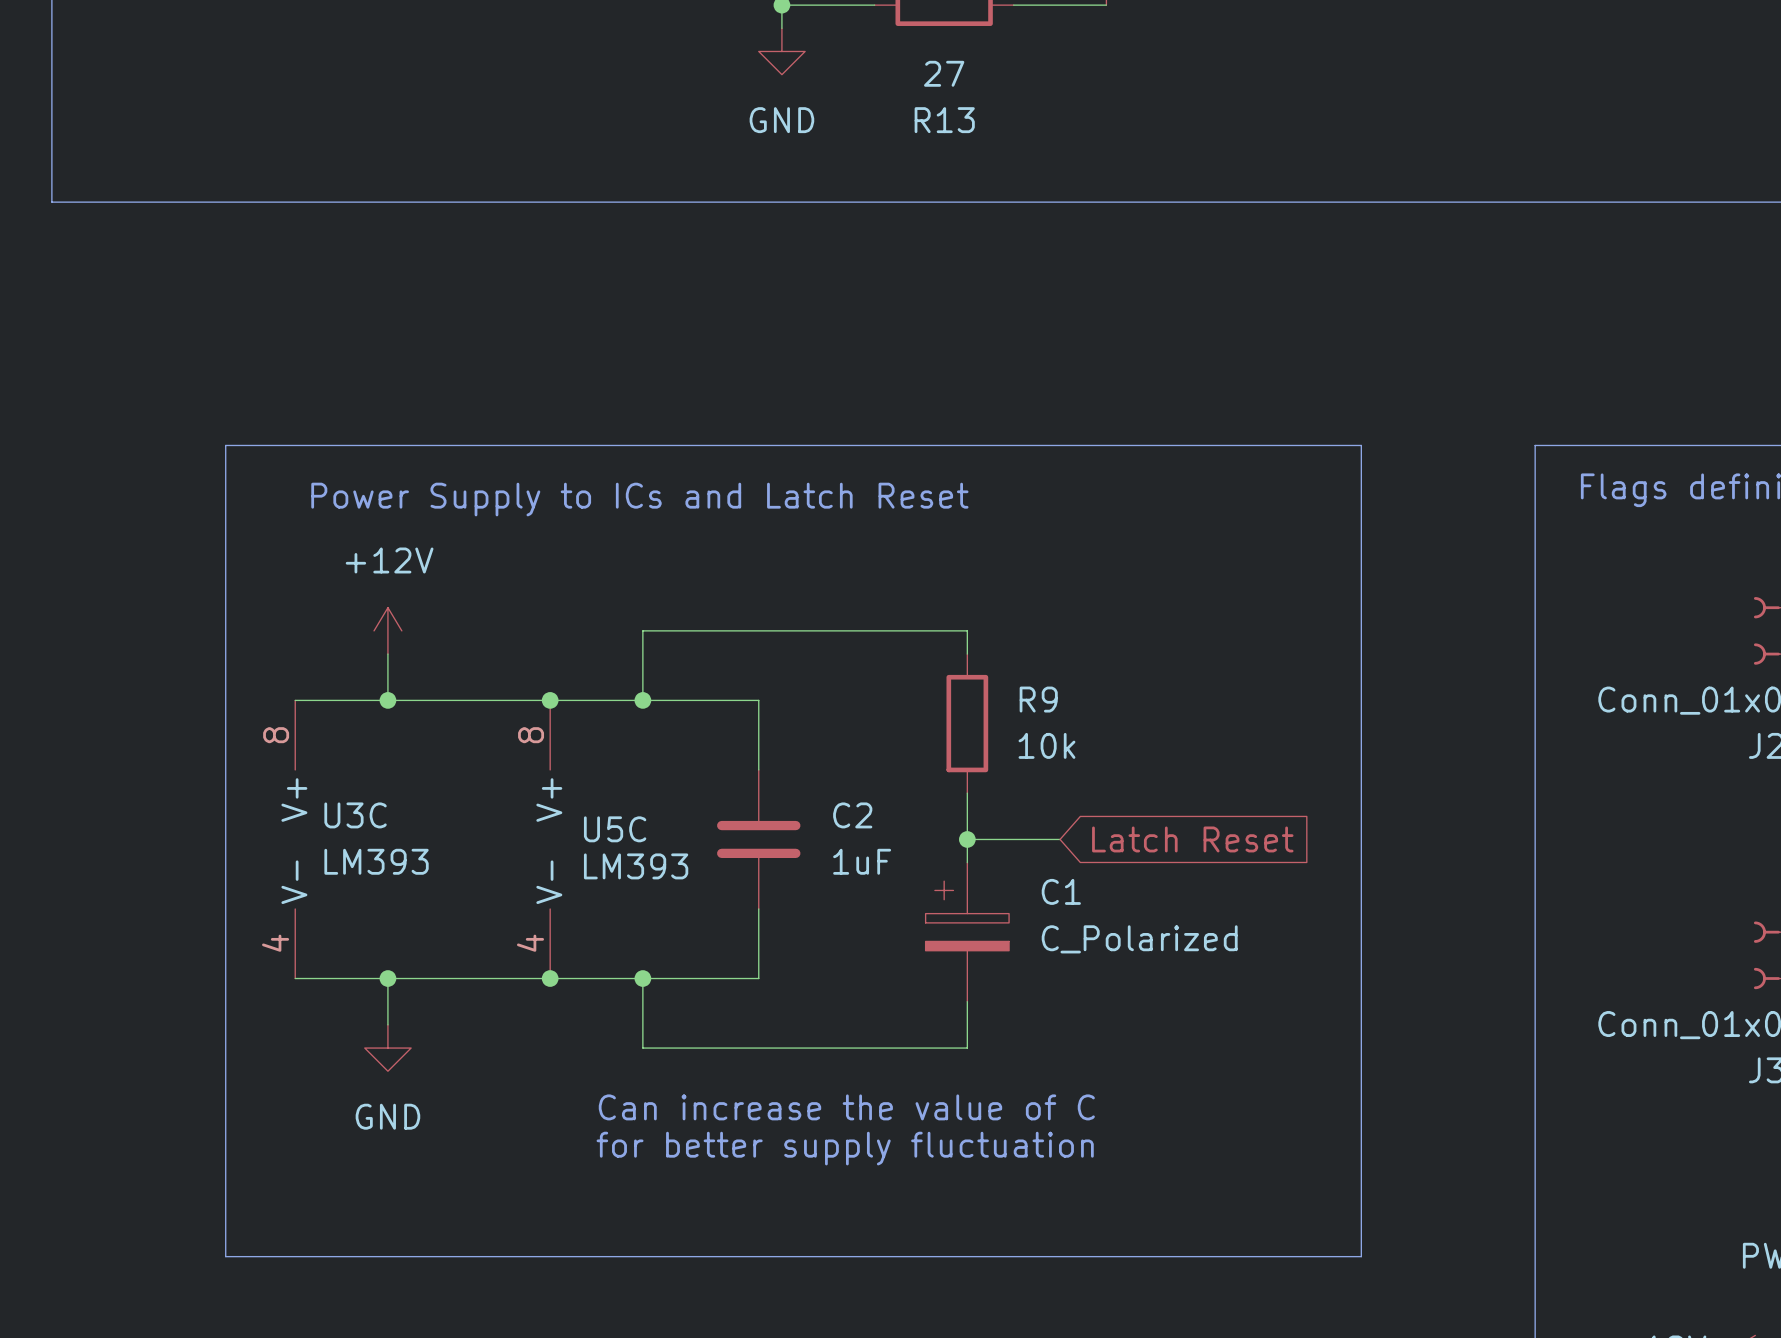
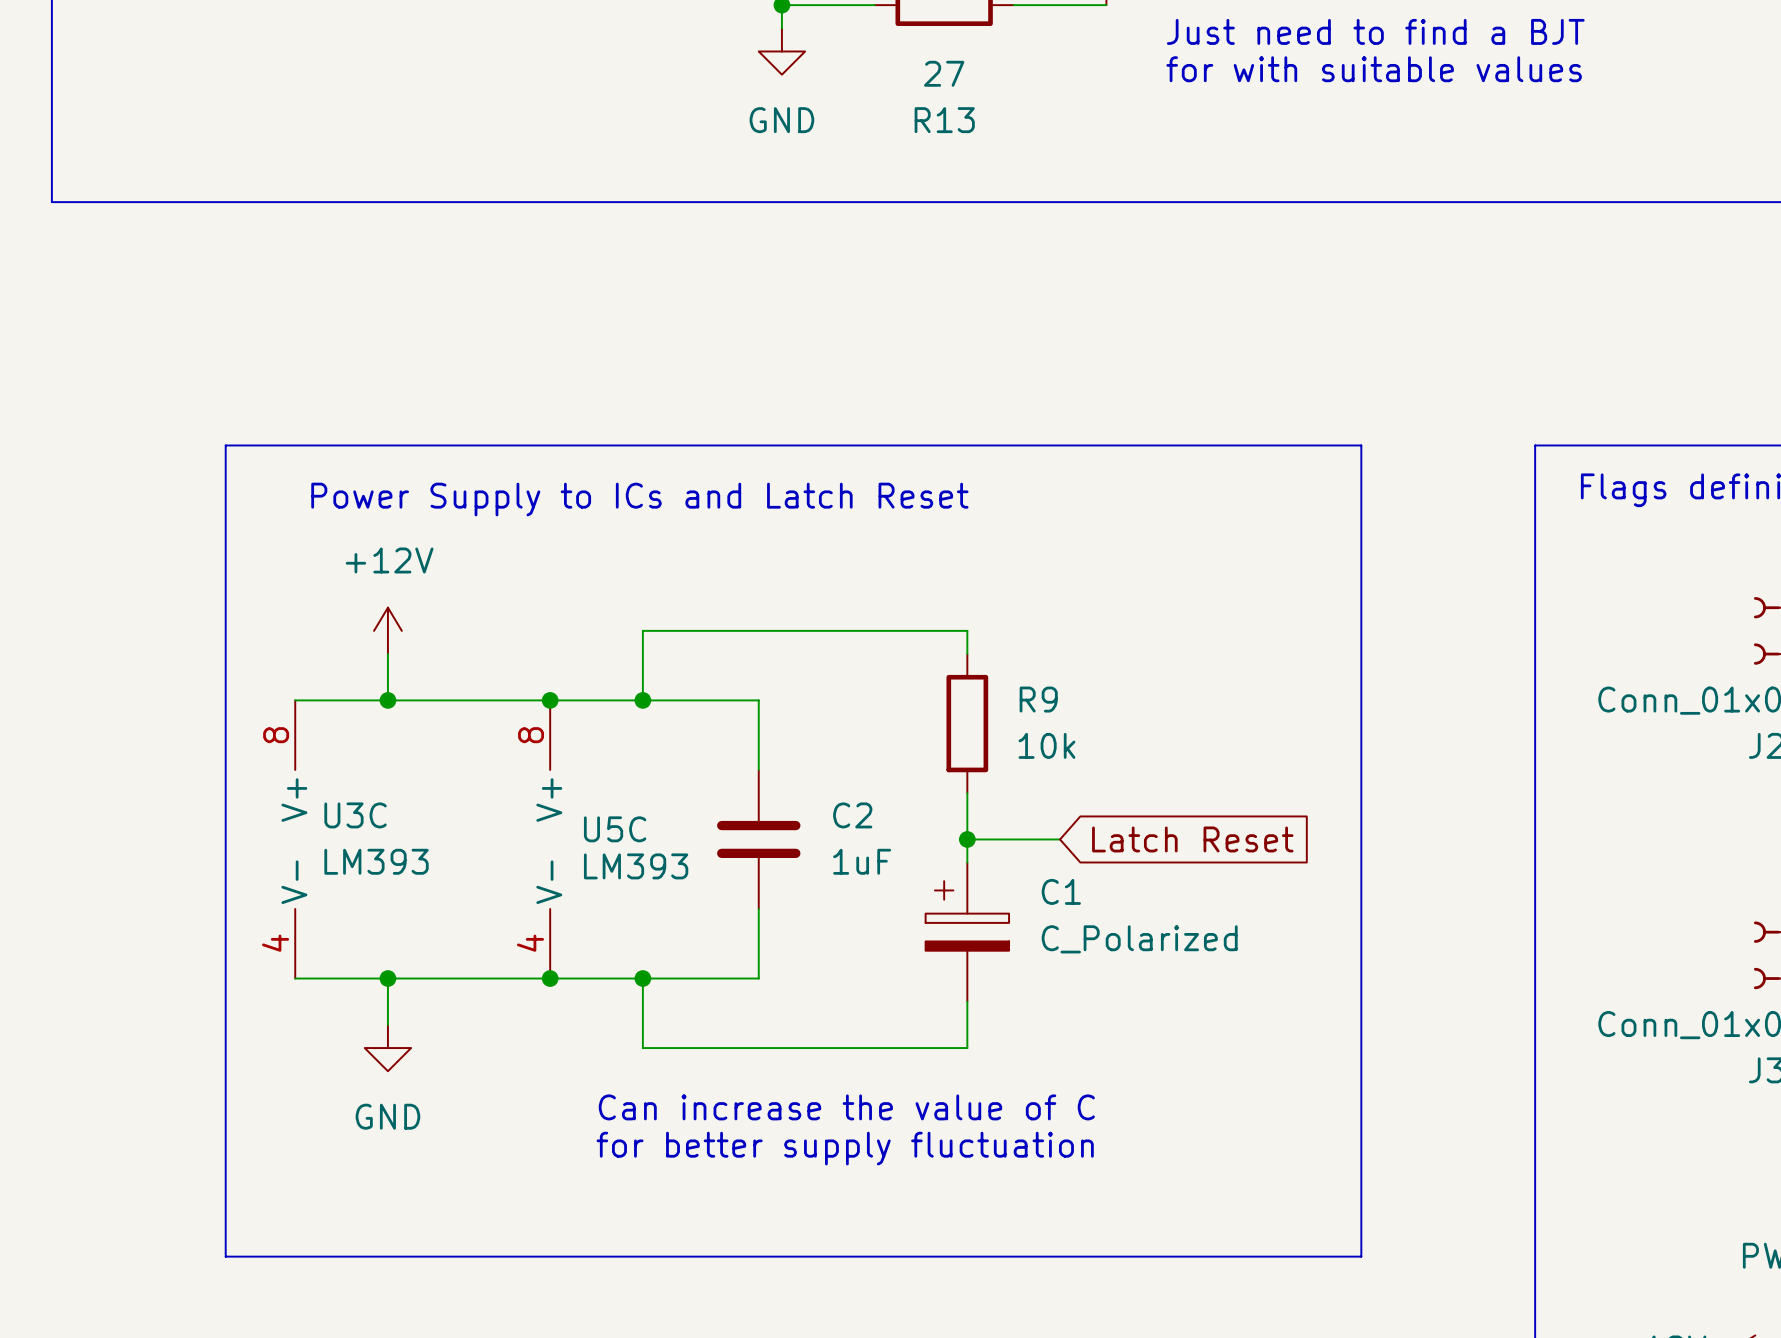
text: none -> Just need to find a BJT (1375, 31)
text: none -> for with suitable values (1374, 69)

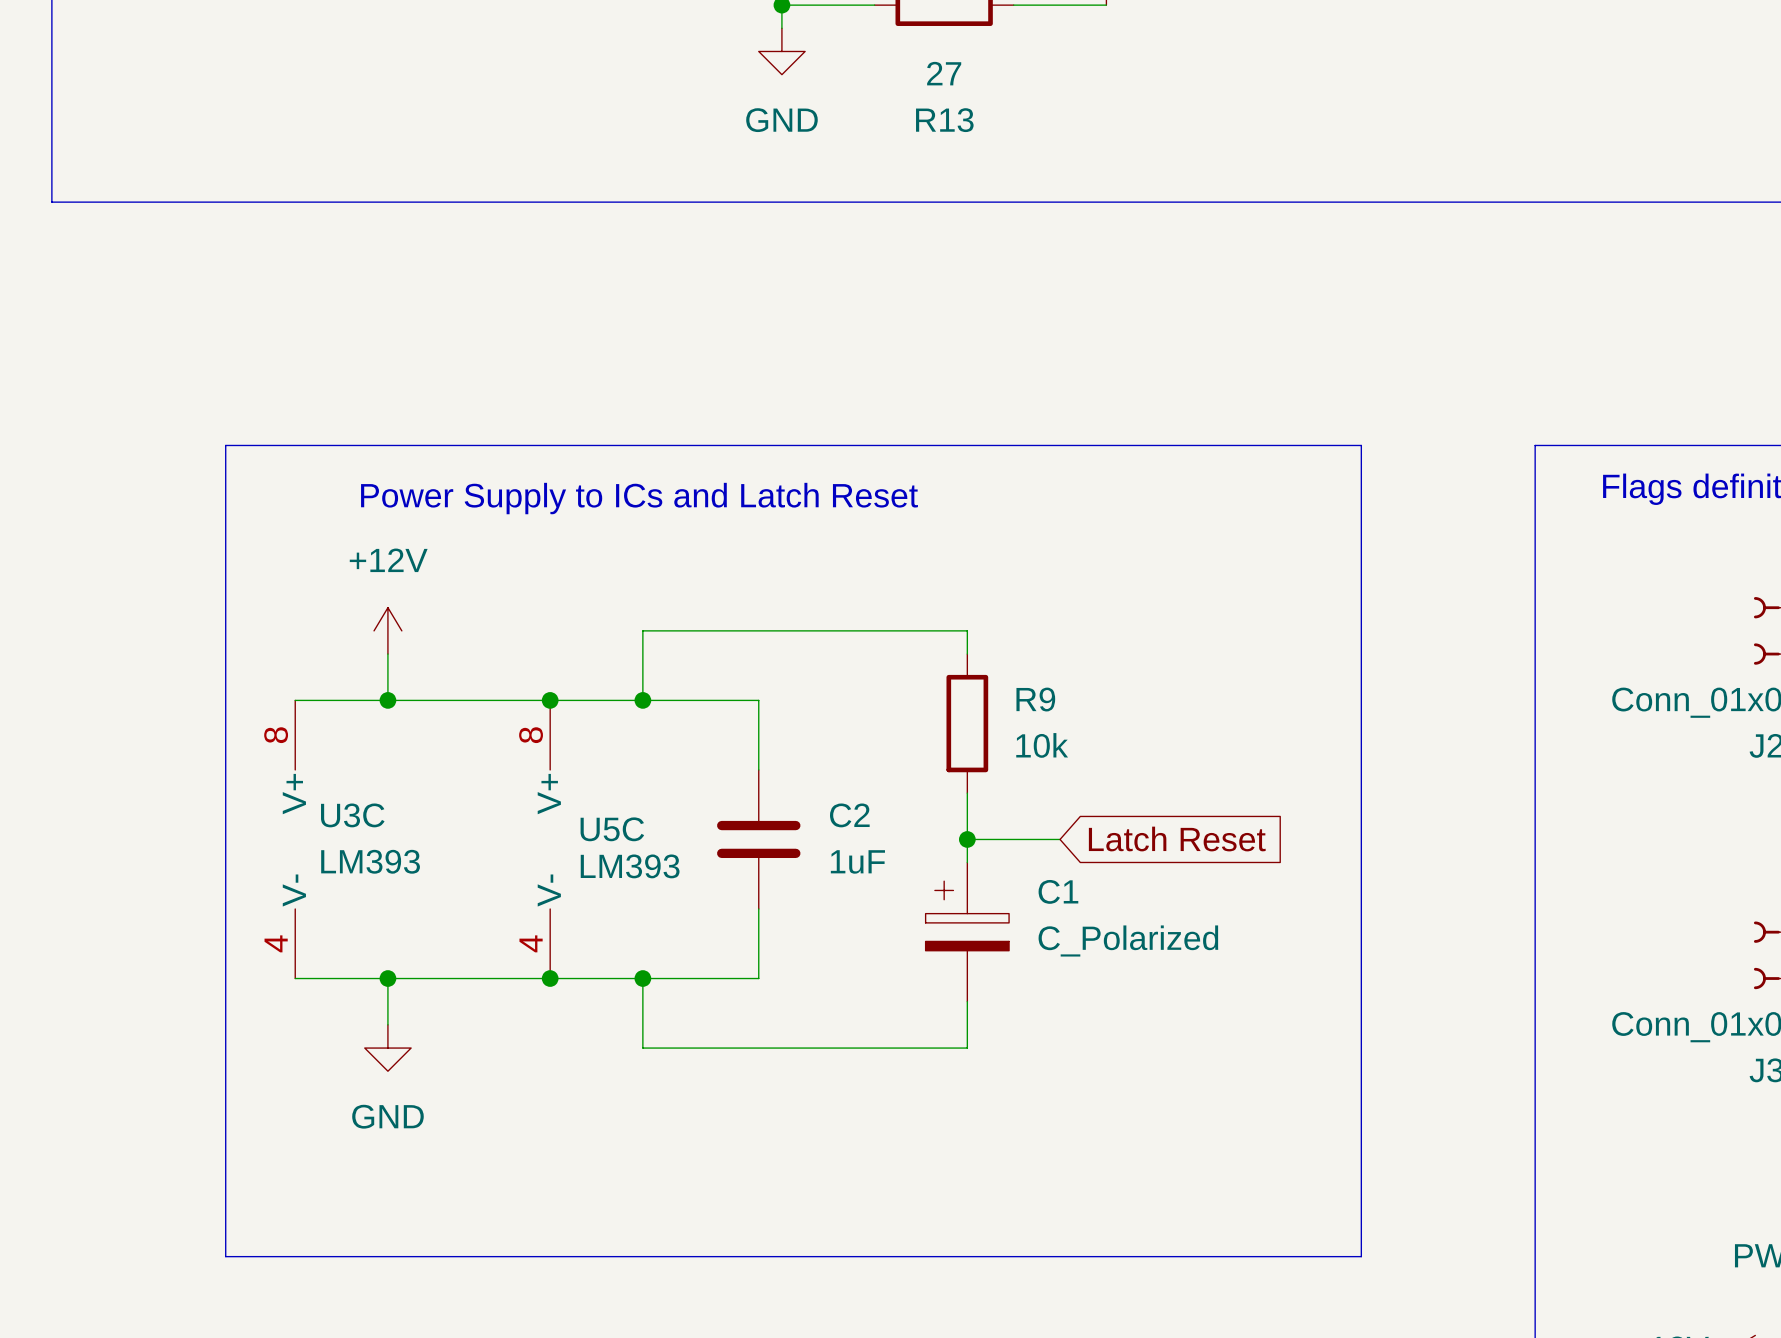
text: Just need to find a BJT (1375, 31) -> none
text: for with suitable values (1374, 69) -> none
text: Can increase the value of C (846, 1107) -> none
text: for better supply fluctuation (845, 1148) -> none

